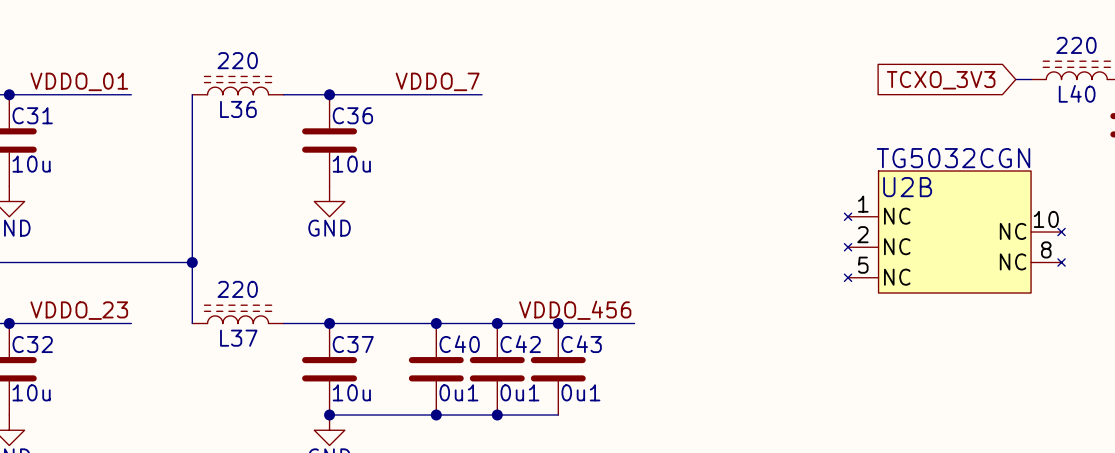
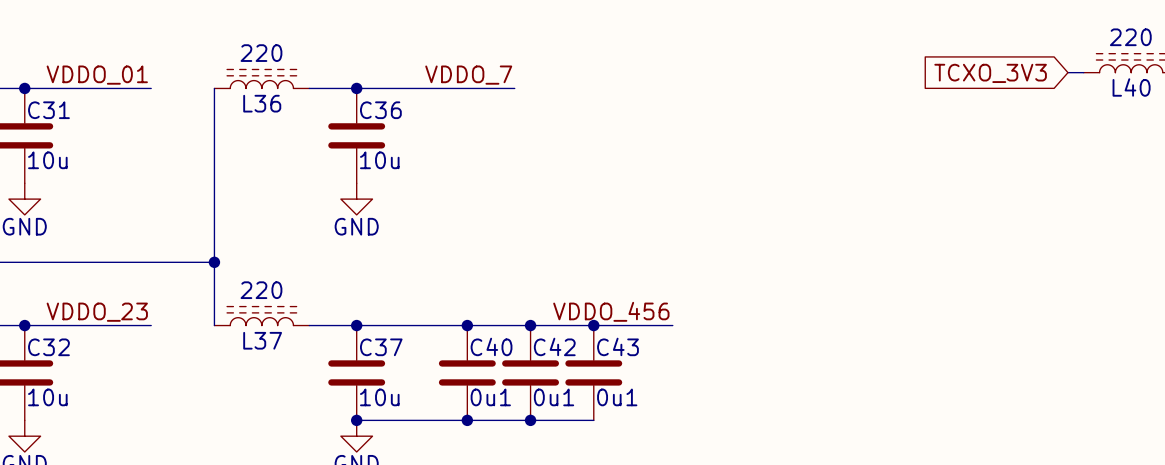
U2B: TG5032CGN (954, 232) -> none

